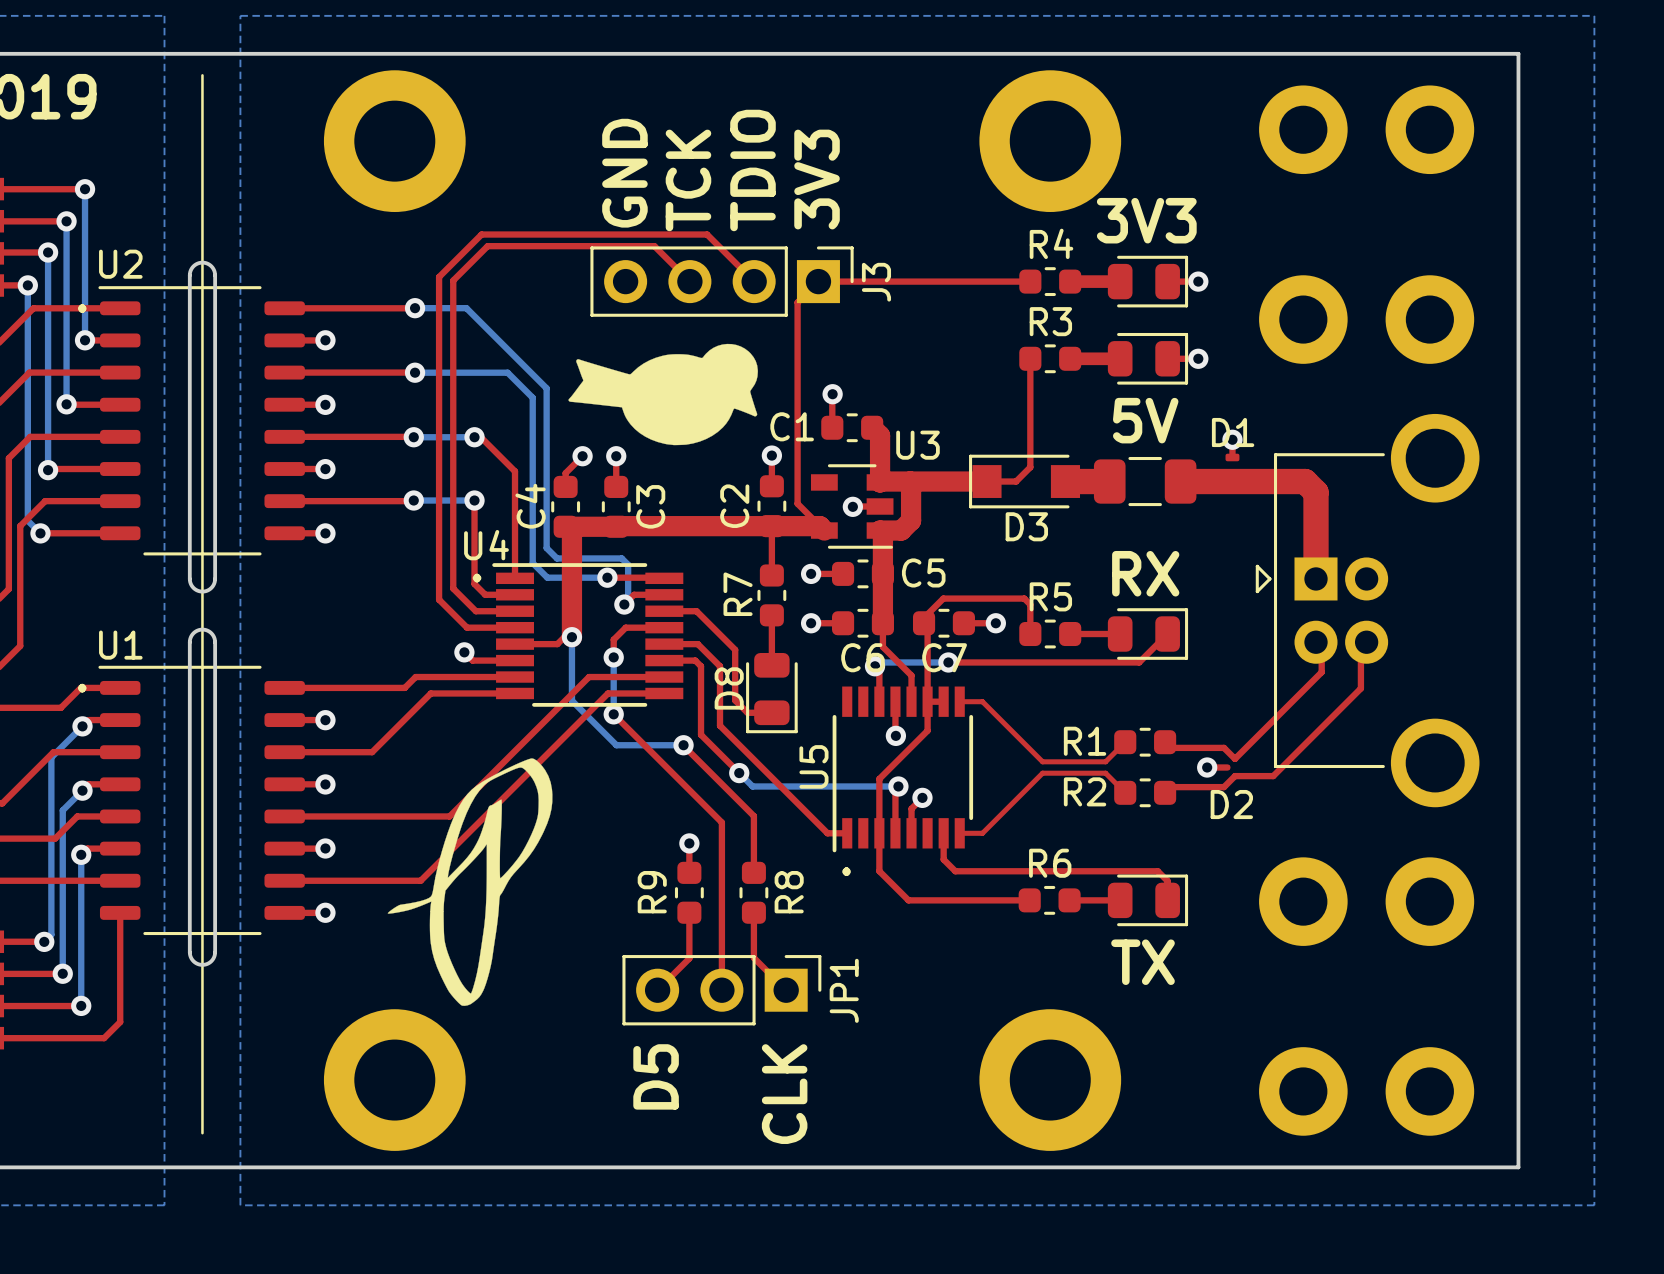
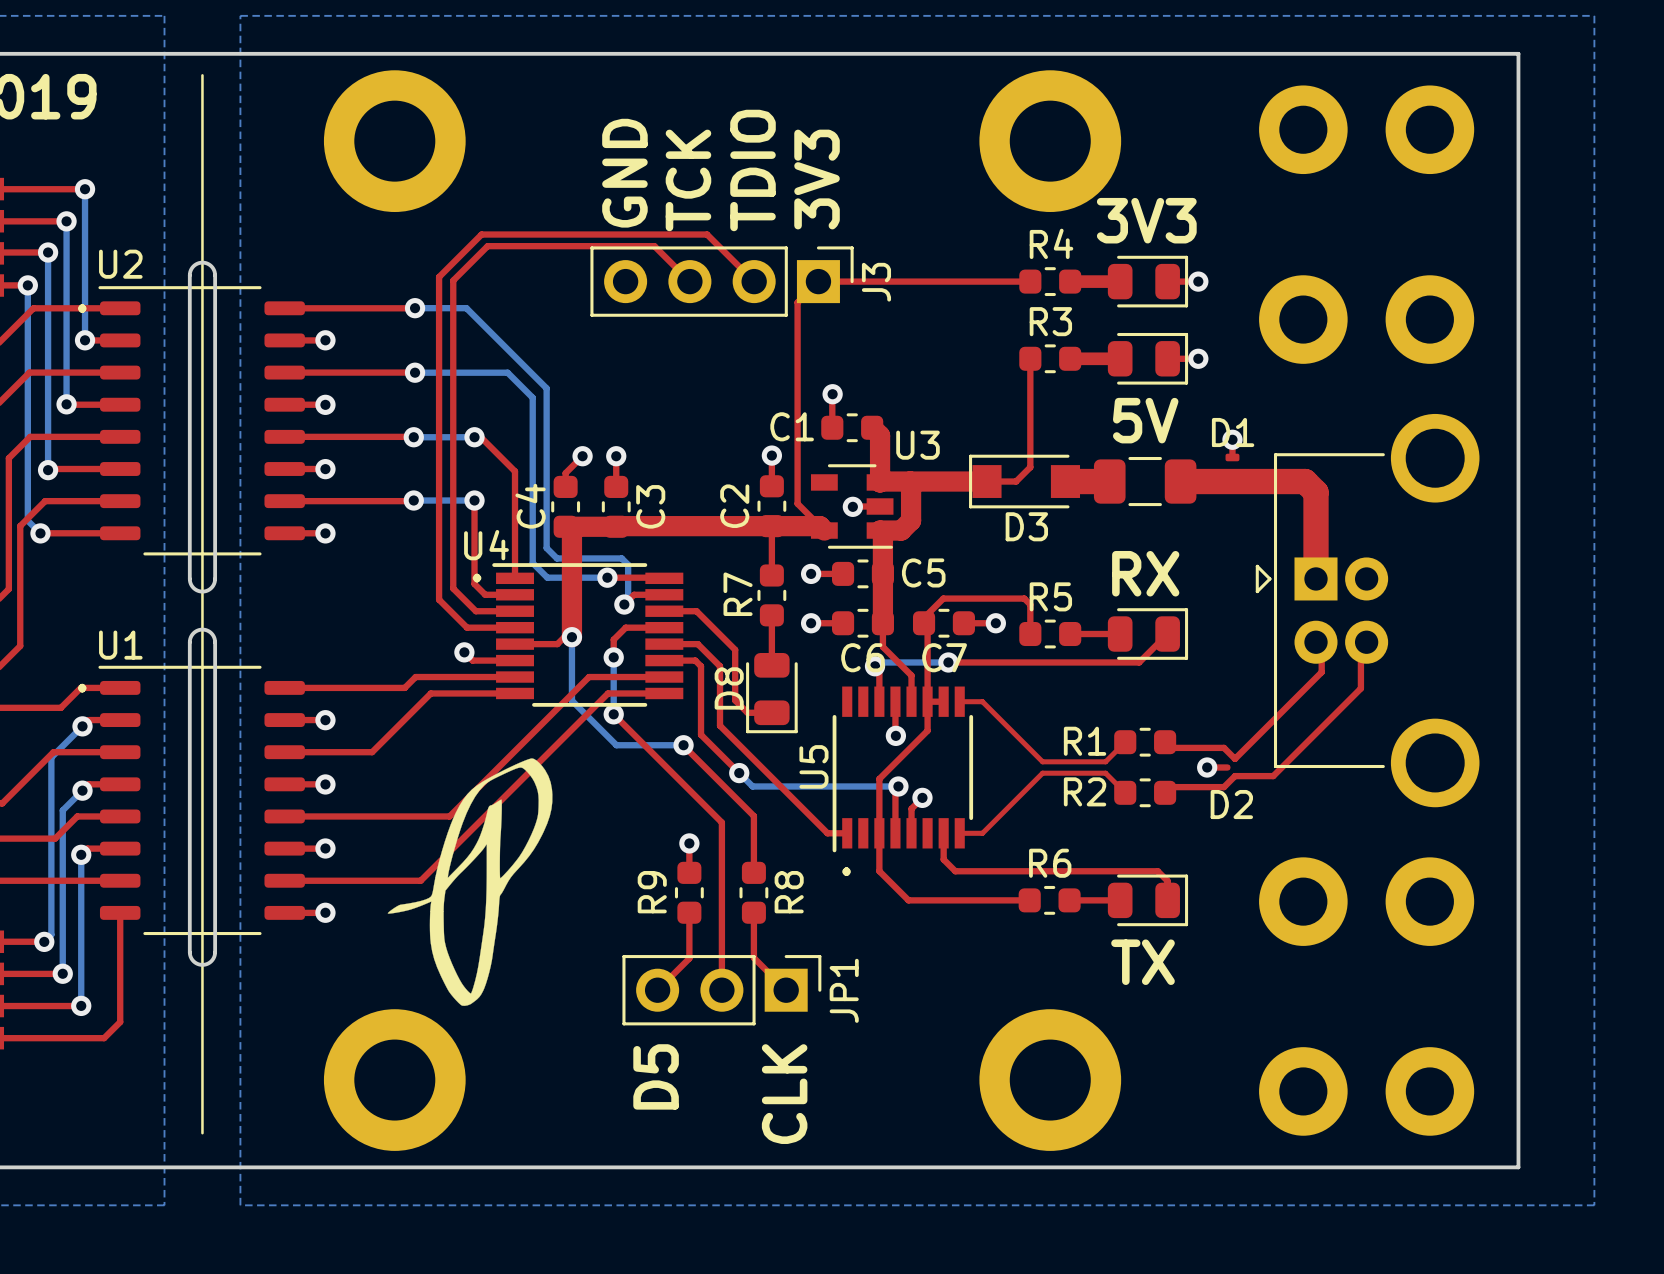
drawing: [568, 343, 758, 446] -> none

